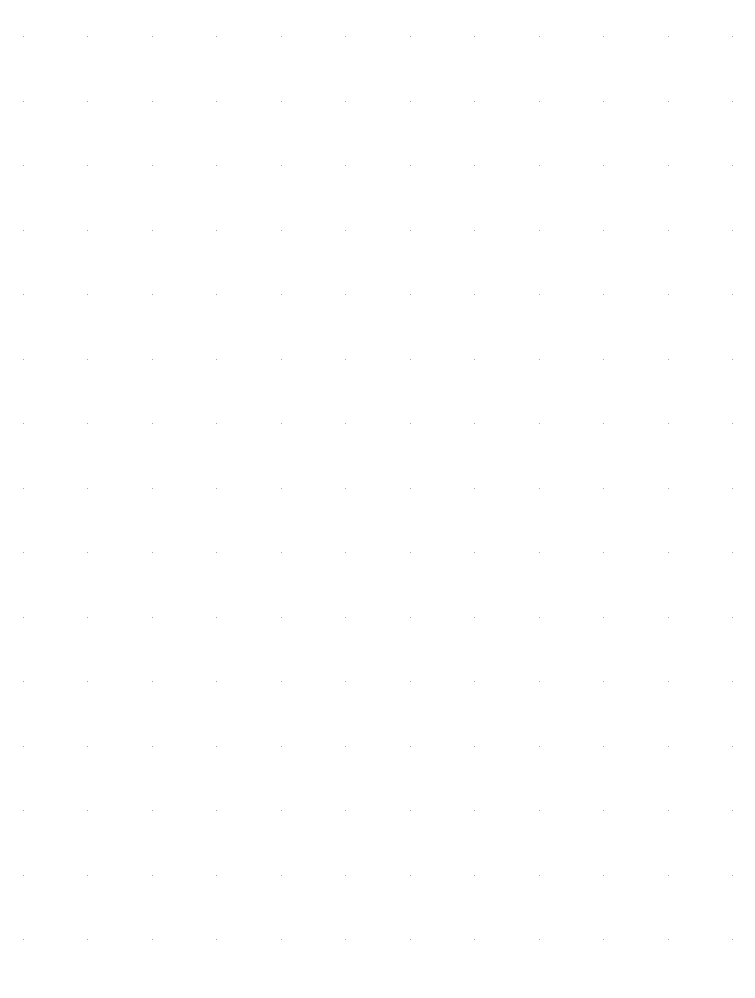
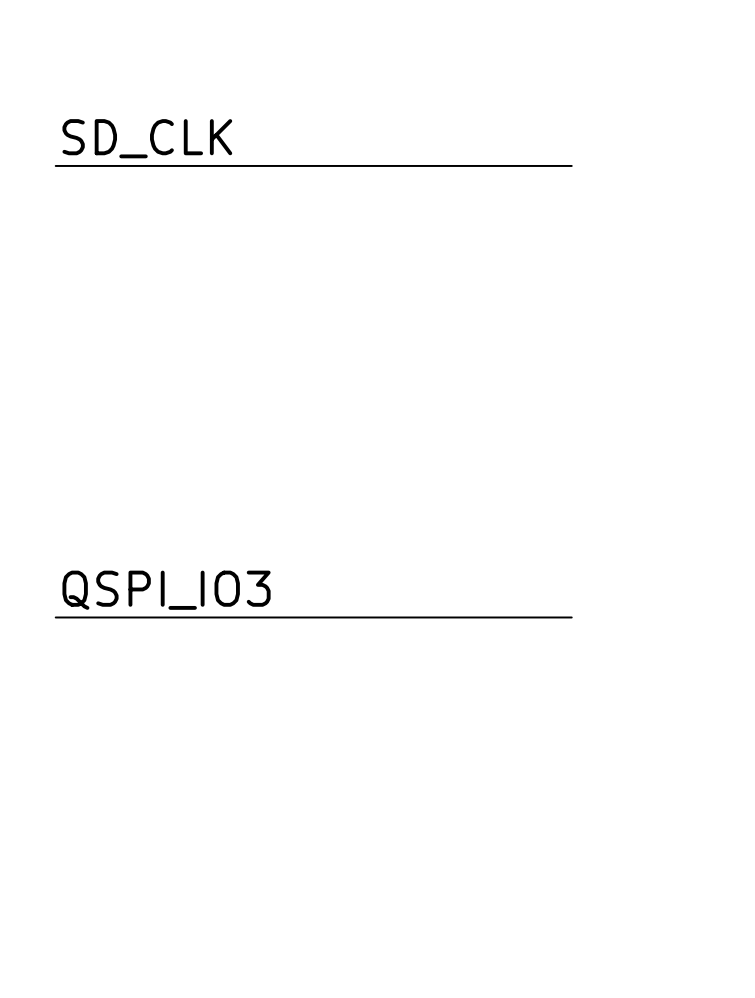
label: none -> SD_CLK (147, 138)
wire: none -> (55, 165) (571, 165)
label: none -> QSPI_IO3 (166, 590)
wire: none -> (55, 617) (571, 617)

